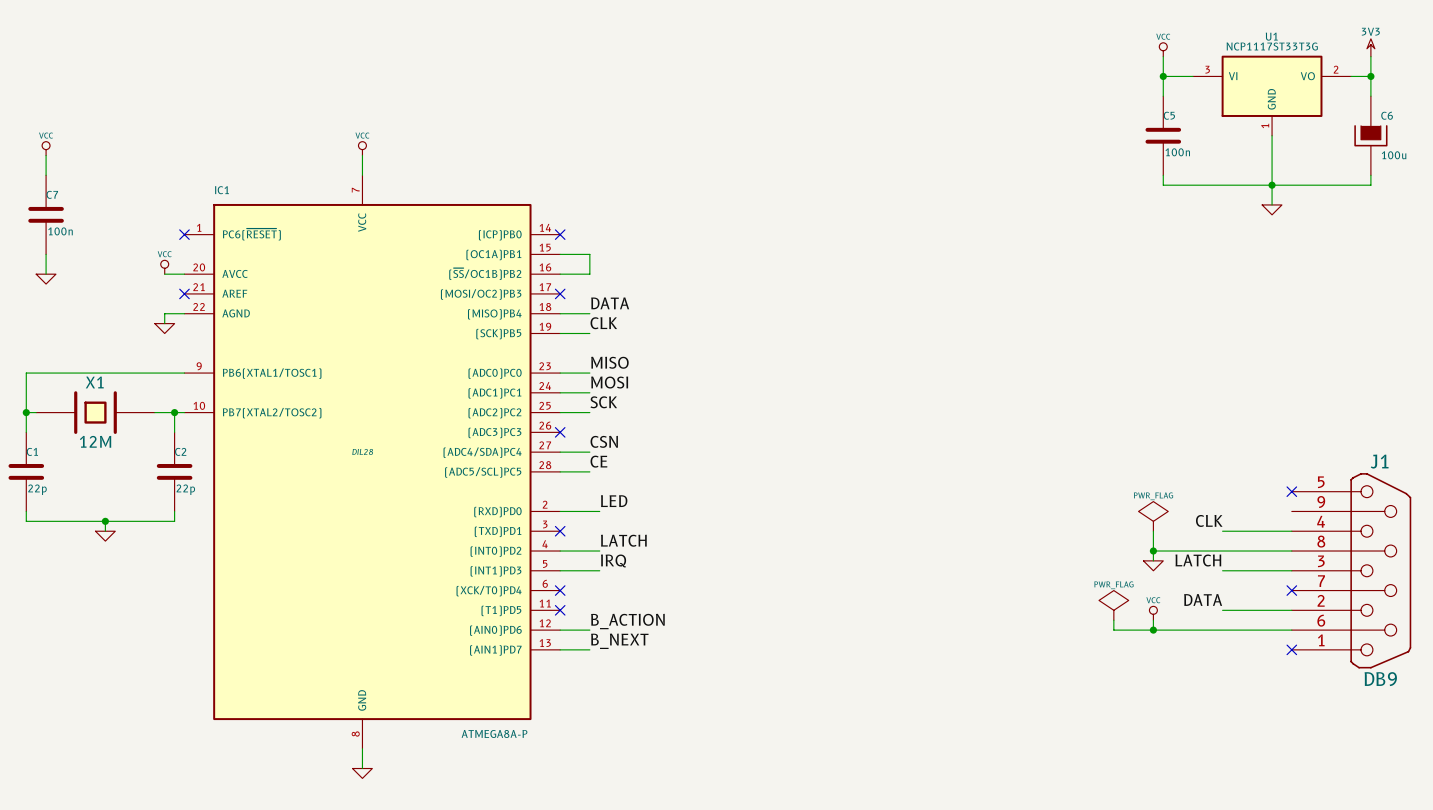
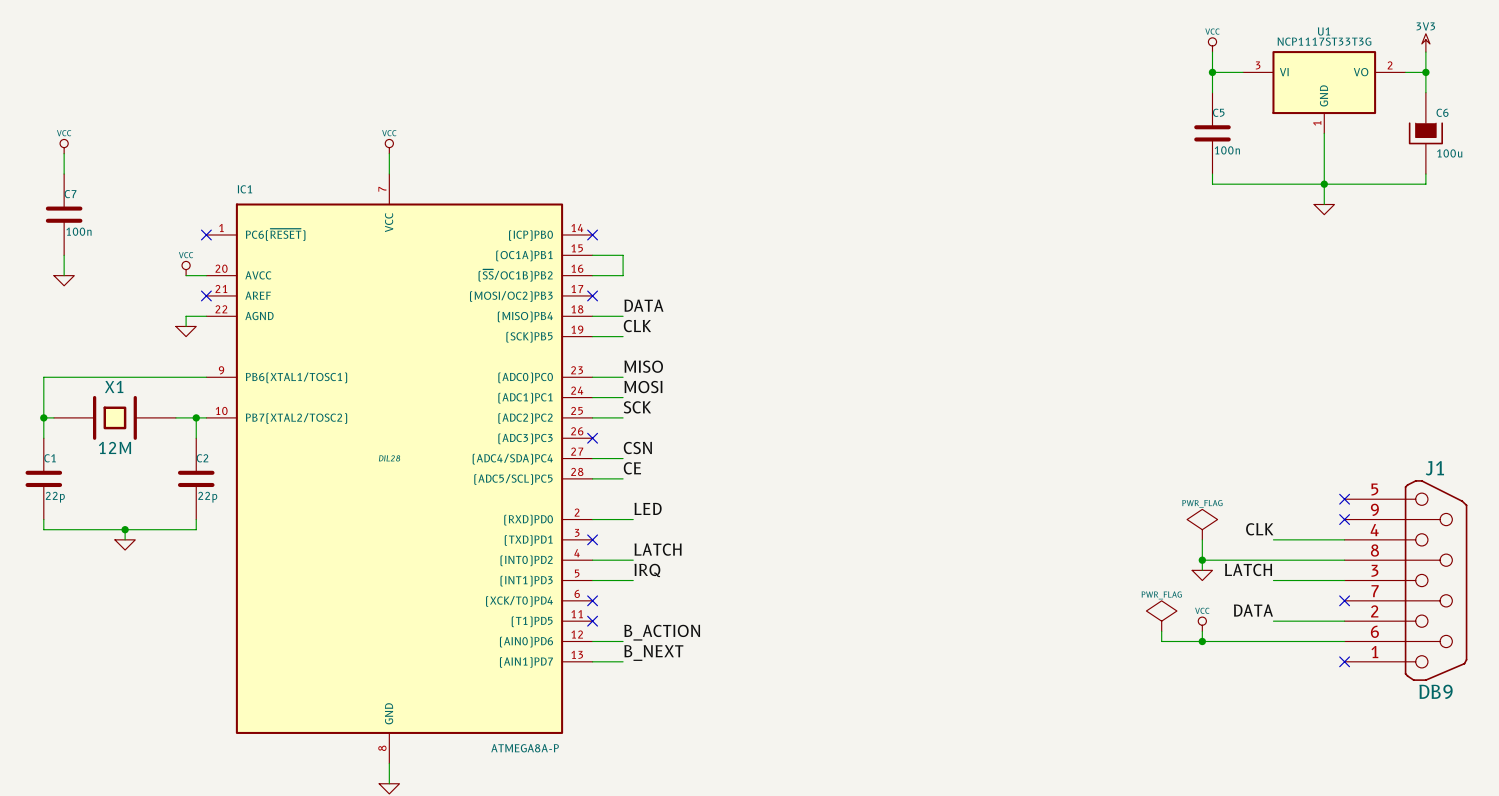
no-connect mark: none -> (1344, 519)

